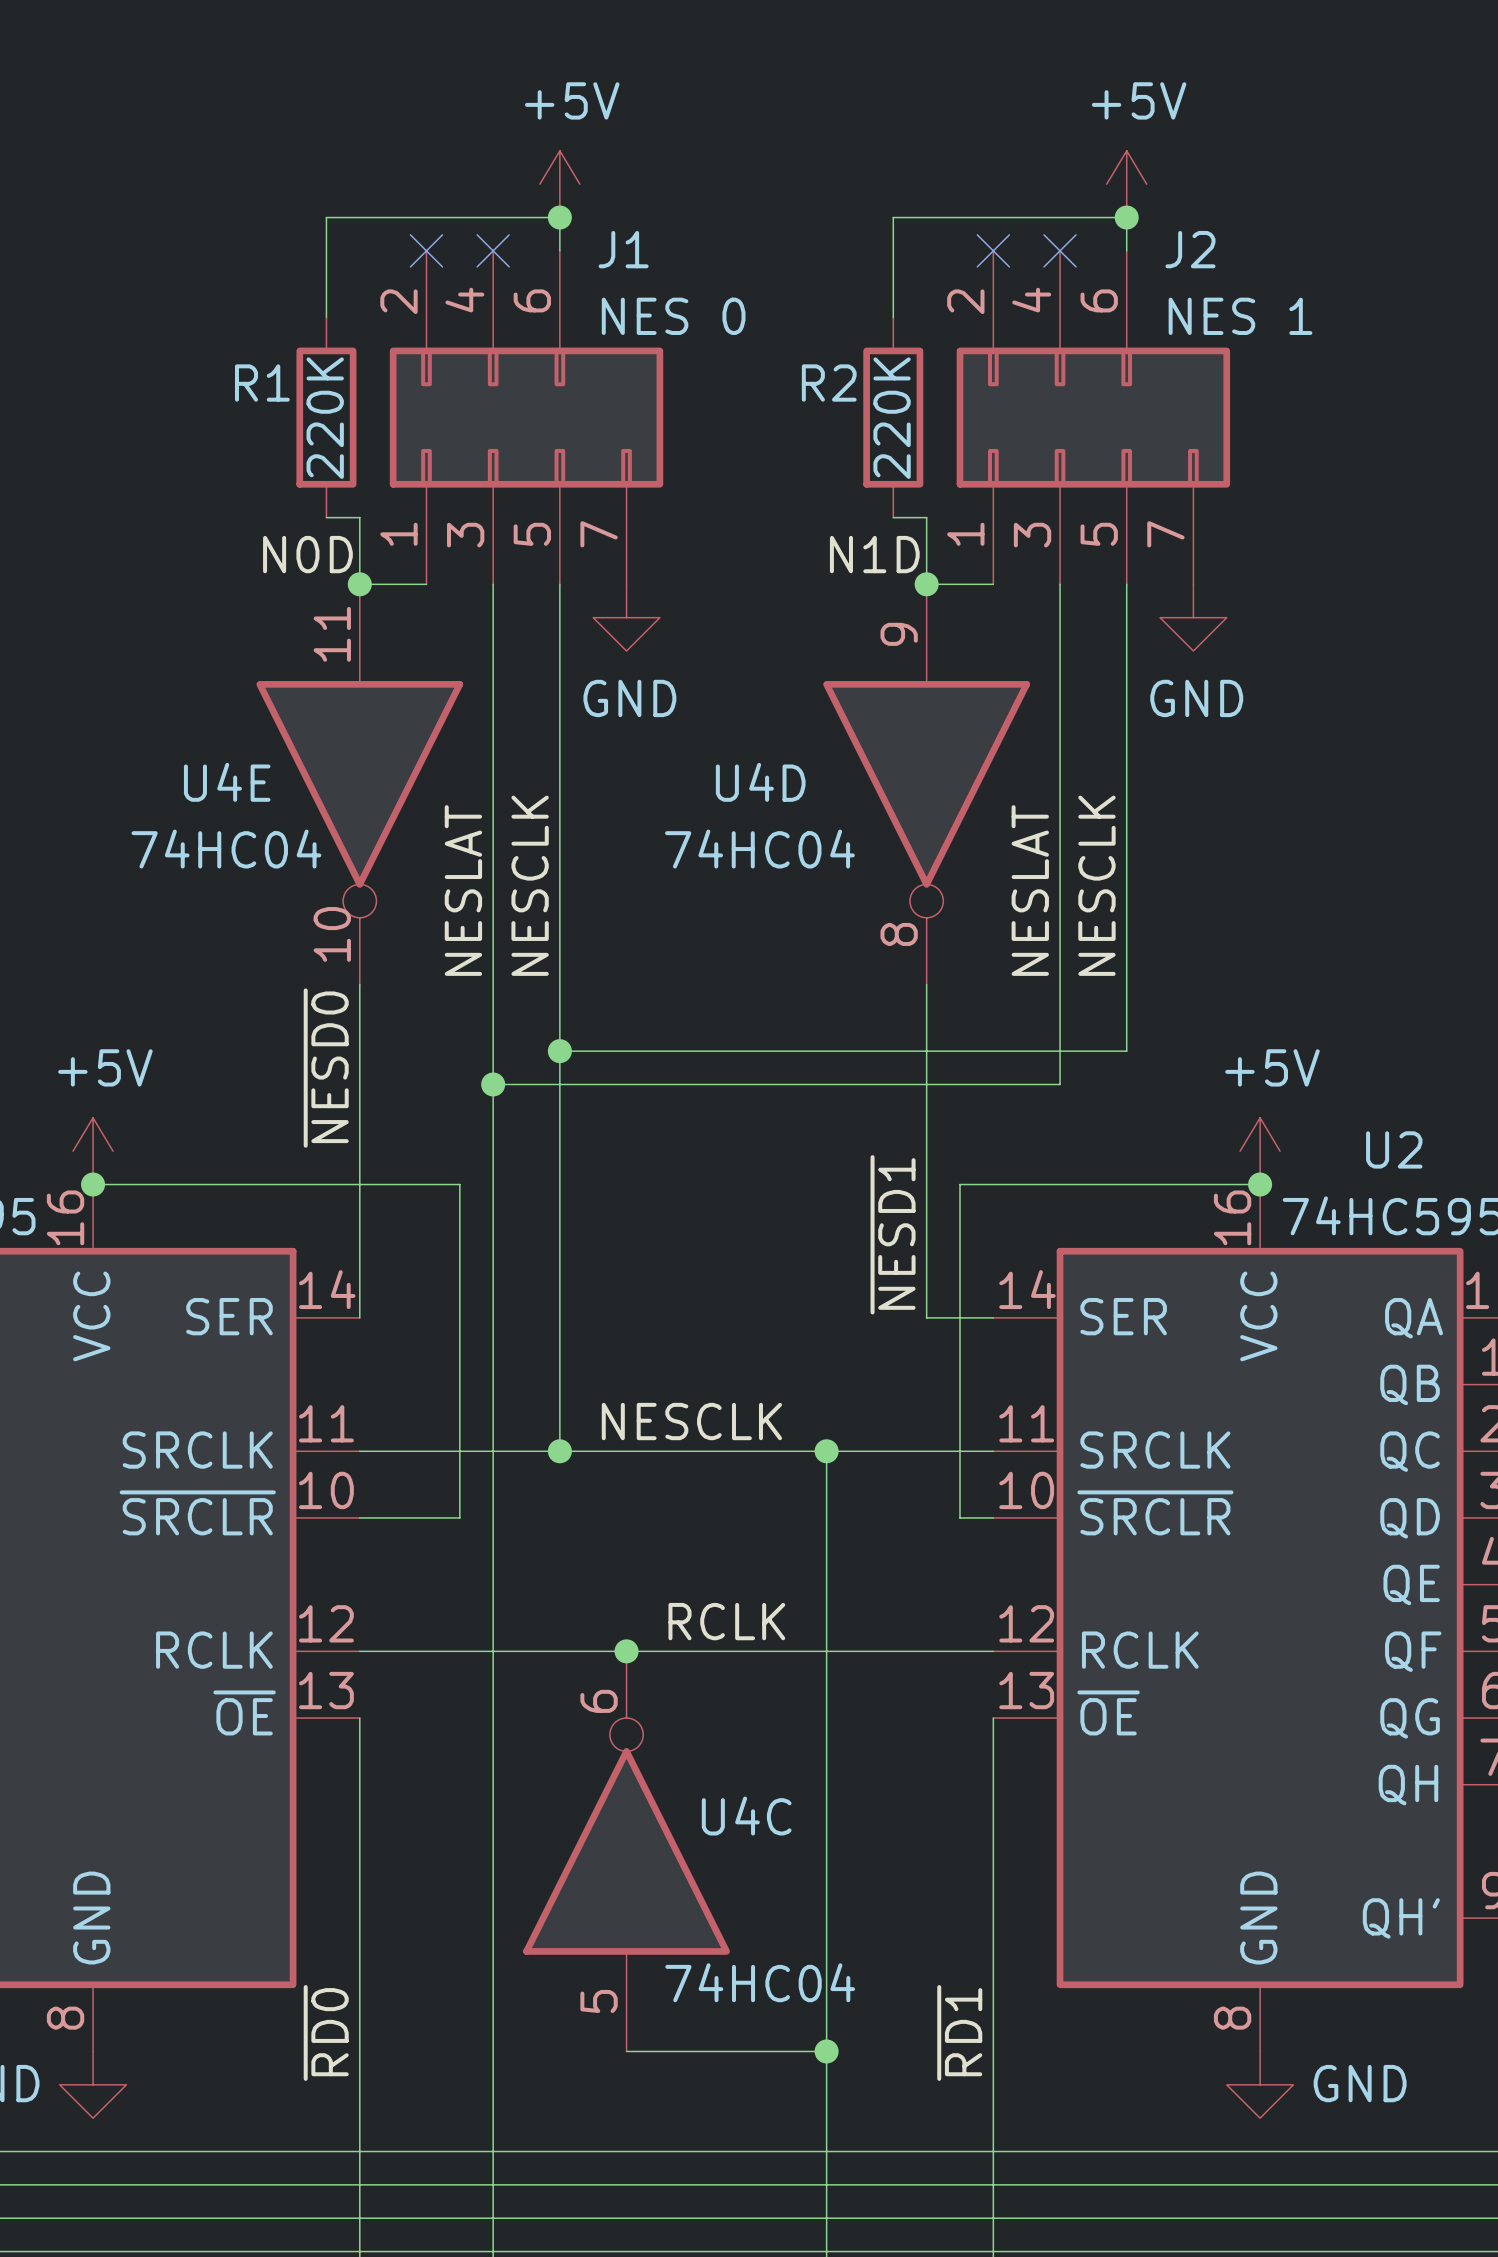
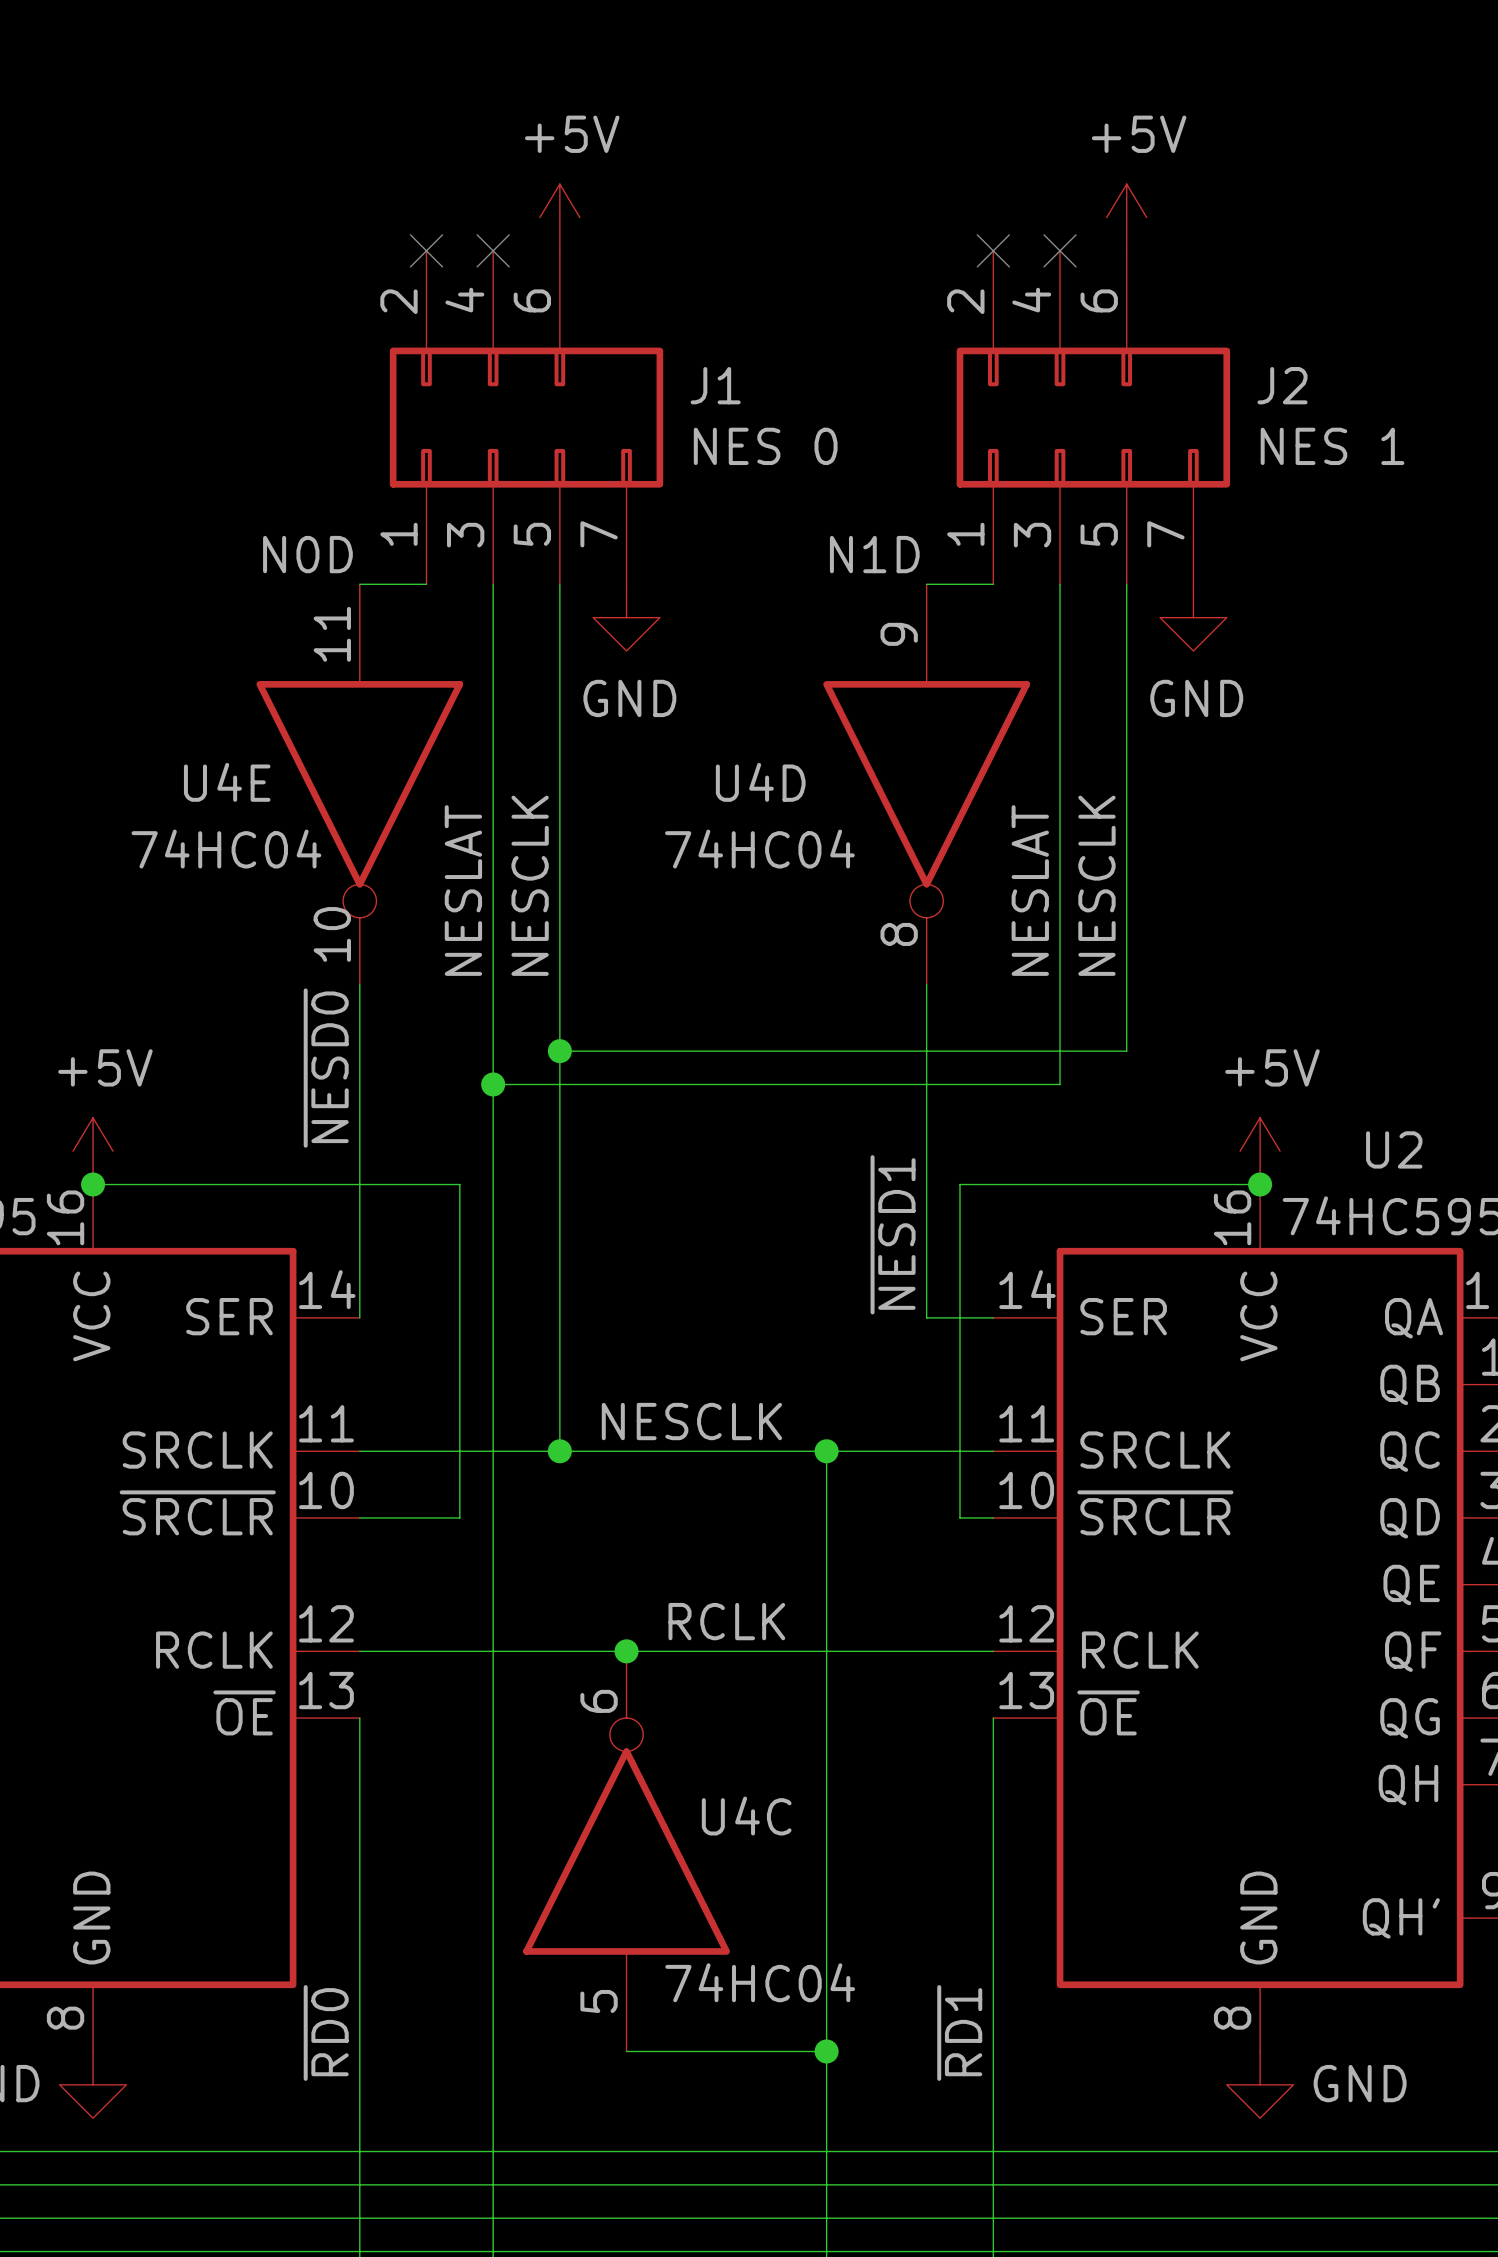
power symbol position: +5V (559, 184) -> +5V (559, 217)
power symbol position: +5V (1126, 184) -> +5V (1126, 217)
junction: (559, 217) -> none
junction: (1126, 217) -> none
J1 name position: J1 (623, 249) -> J1 (715, 385)
J2 name position: J2 (1190, 249) -> J2 (1282, 385)
wire: (559, 250) (559, 217) (326, 217) (326, 317) -> none
wire: (1126, 250) (1126, 217) (893, 217) (893, 317) -> none
J1 value position: NES 0 (673, 316) -> NES 0 (765, 446)
J2 value position: NES 1 (1240, 316) -> NES 1 (1332, 446)
R1: 220K (326, 417) -> none
R2: 220K (893, 417) -> none
wire: (326, 517) (359, 517) (359, 584) -> none
wire: (893, 517) (926, 517) (926, 584) -> none
junction: (359, 584) -> none
junction: (926, 584) -> none

